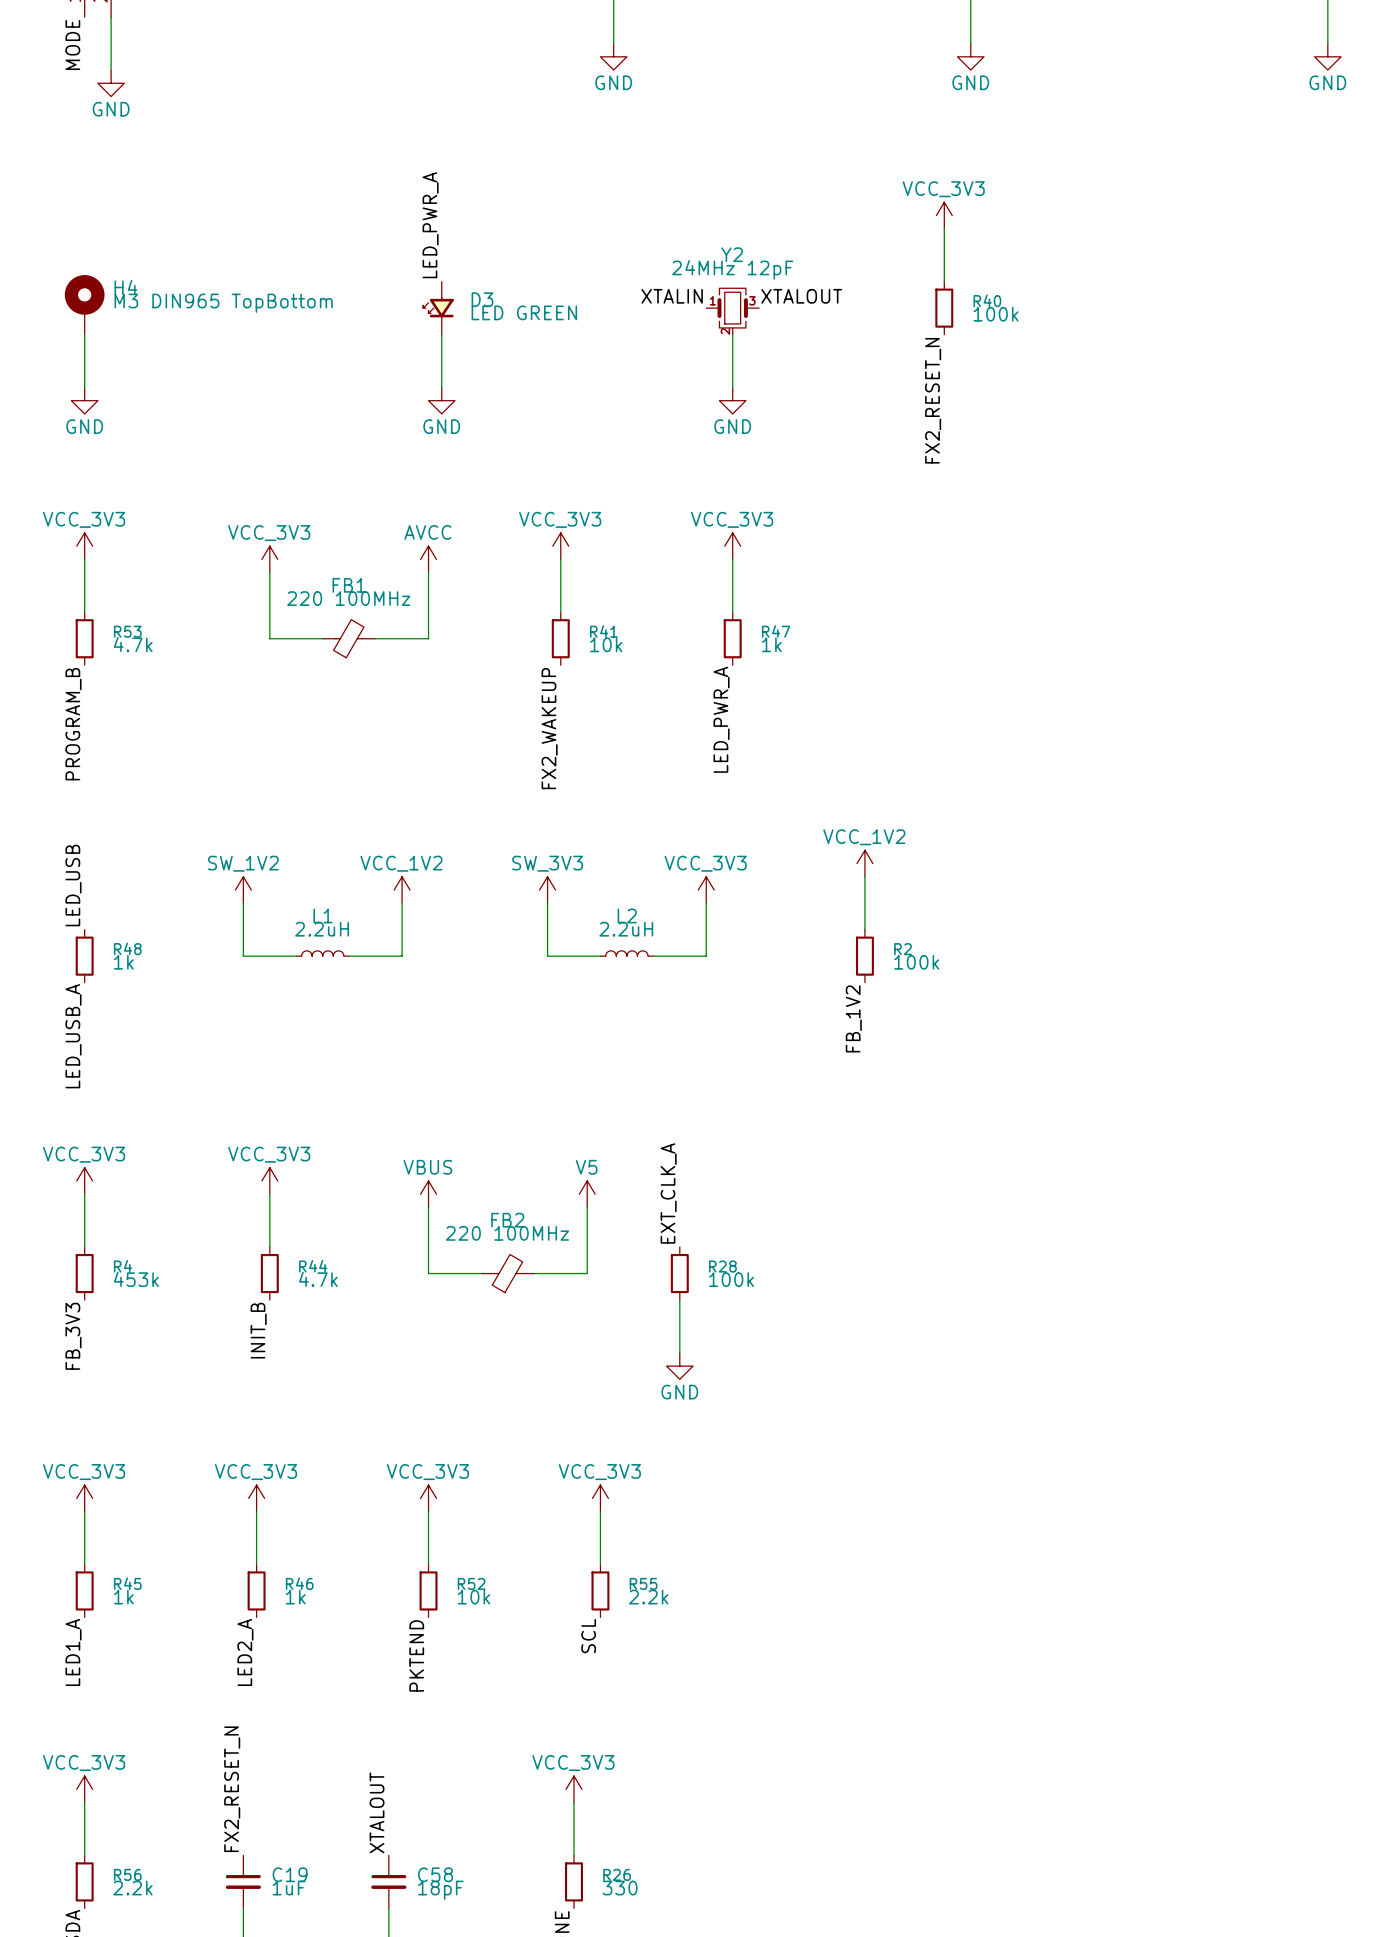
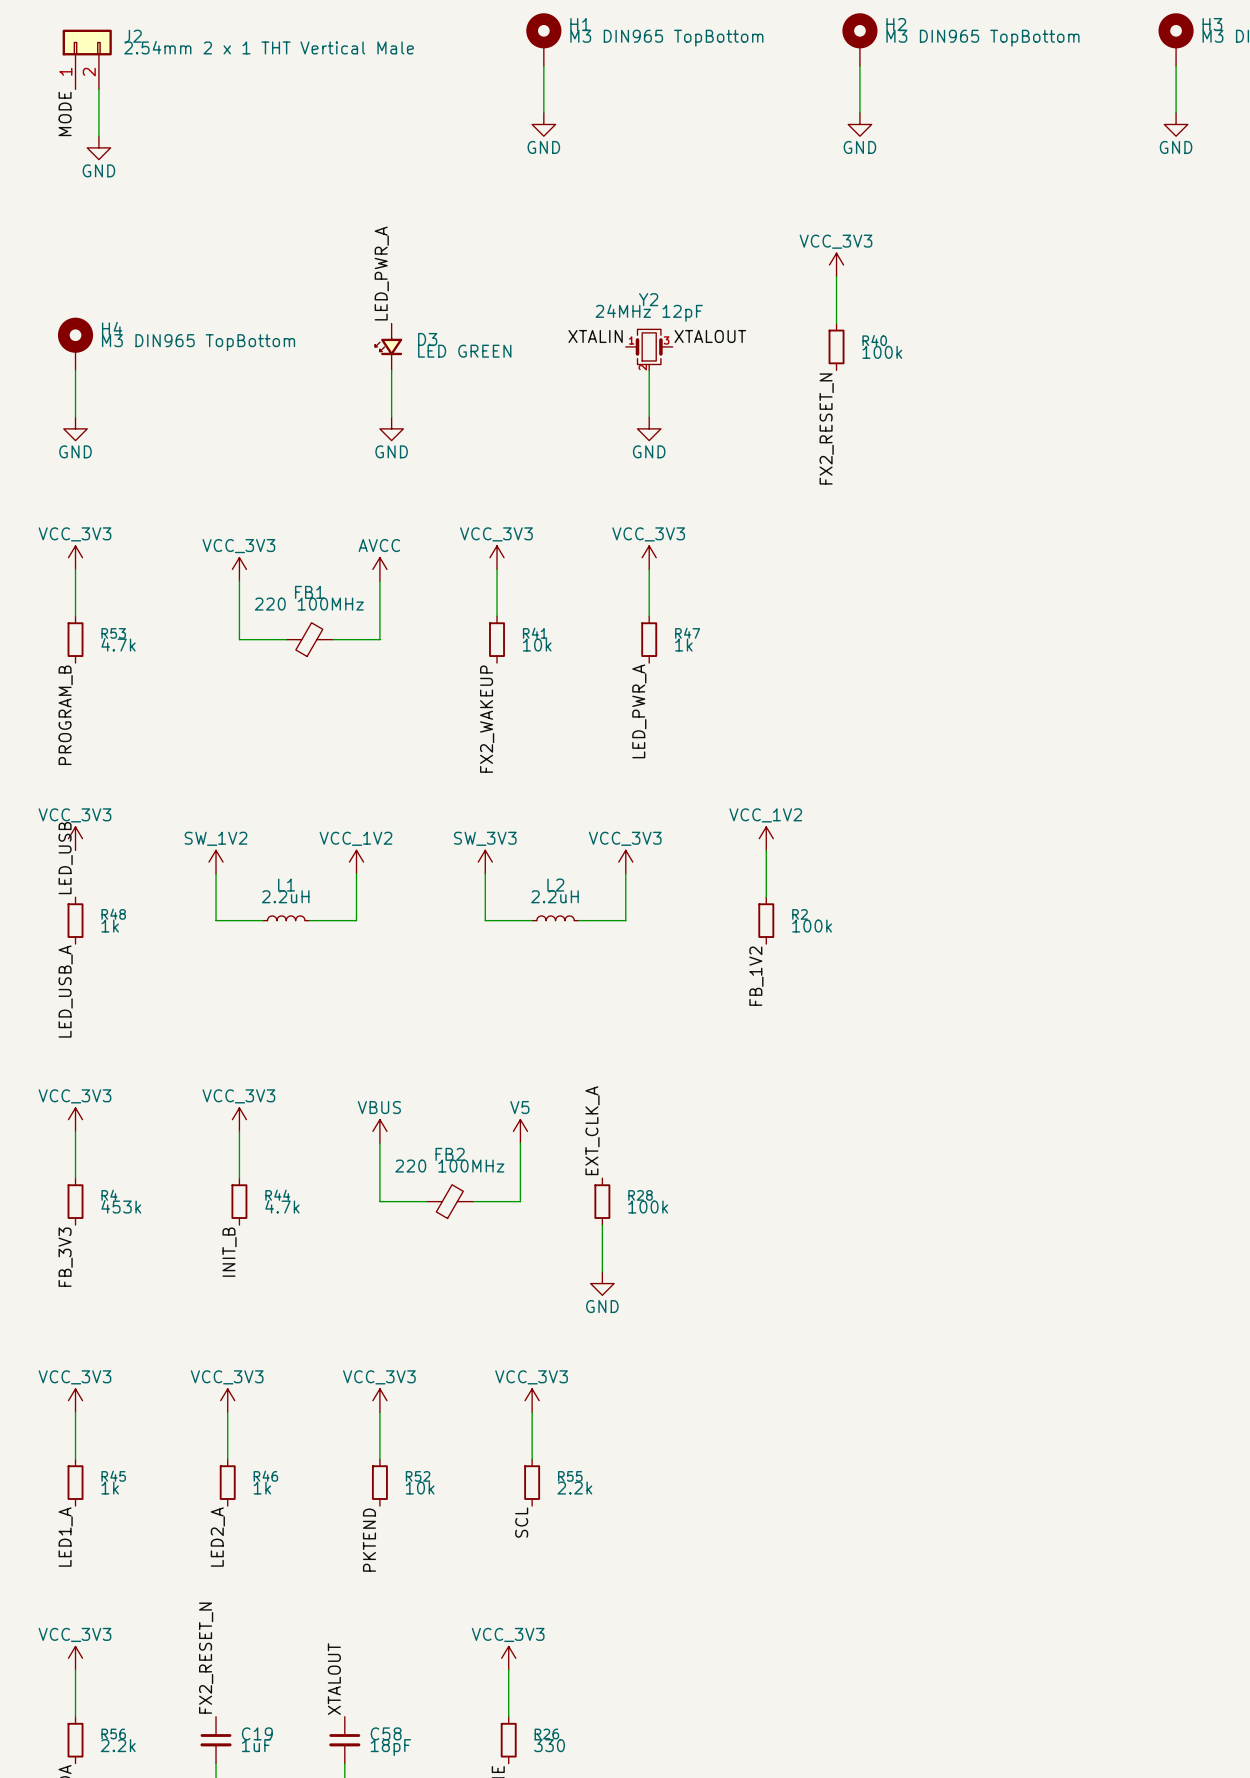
power symbol: none -> VCC_3V3 (75, 838)

